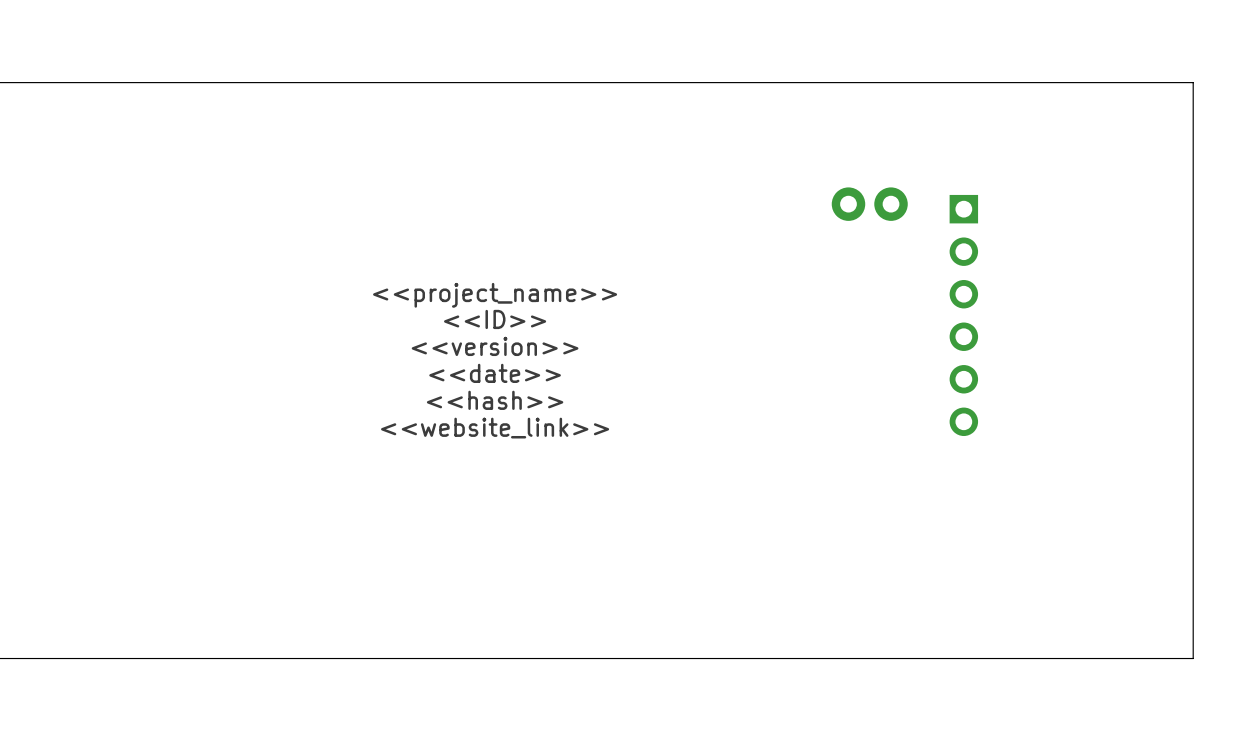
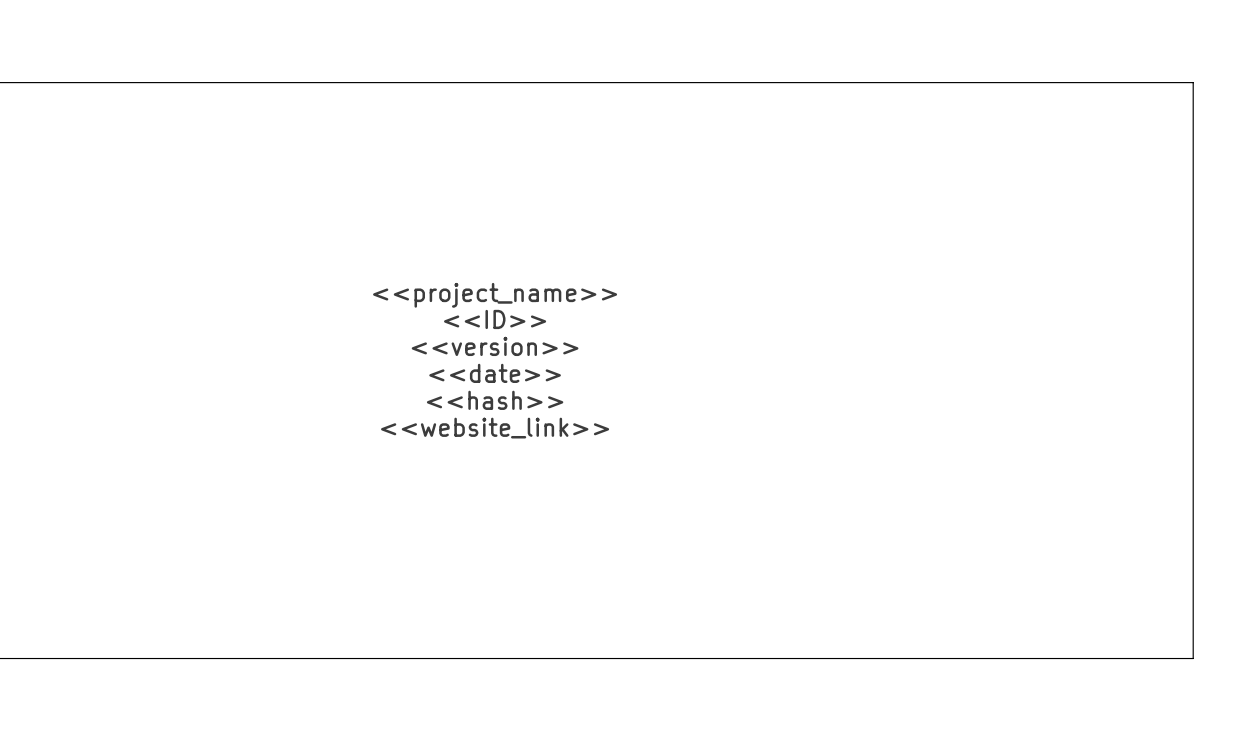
part: (869, 204) -> none
part: (963, 315) -> none

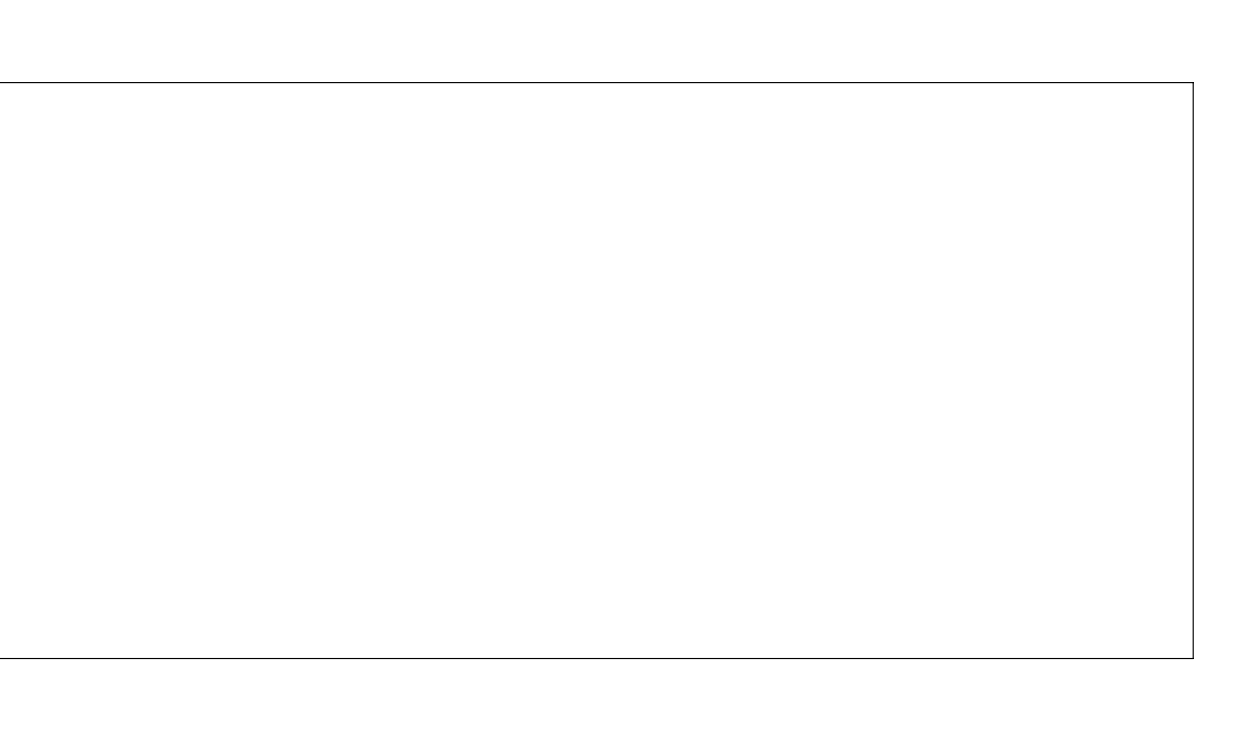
text: <<project_name>> (495, 295) -> none
text: <<ID>> (495, 319) -> none
text: <<version>> (495, 346) -> none
text: <<date>> (495, 373) -> none
text: <<hash>> (495, 400) -> none
text: <<website_link>> (495, 428) -> none

